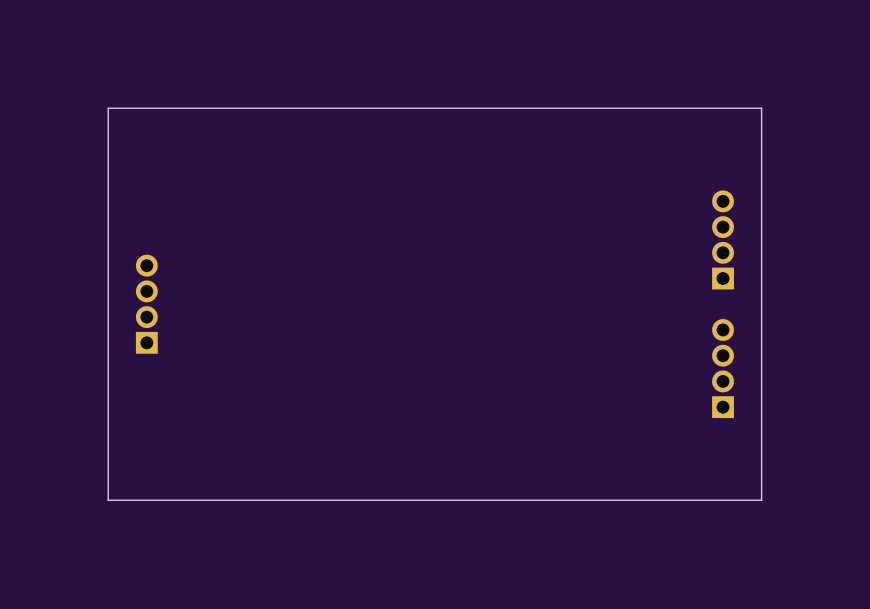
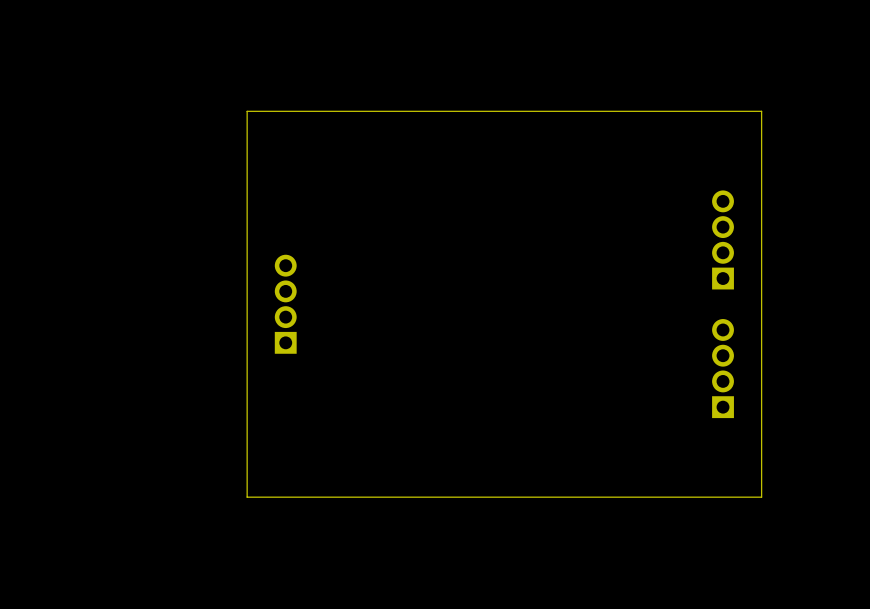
board edge: (761, 111) (761, 108) (108, 108) (108, 500) (761, 500) (761, 497) -> (761, 111) (247, 111) (247, 497) (761, 497)
part position: (146, 304) -> (285, 304)

